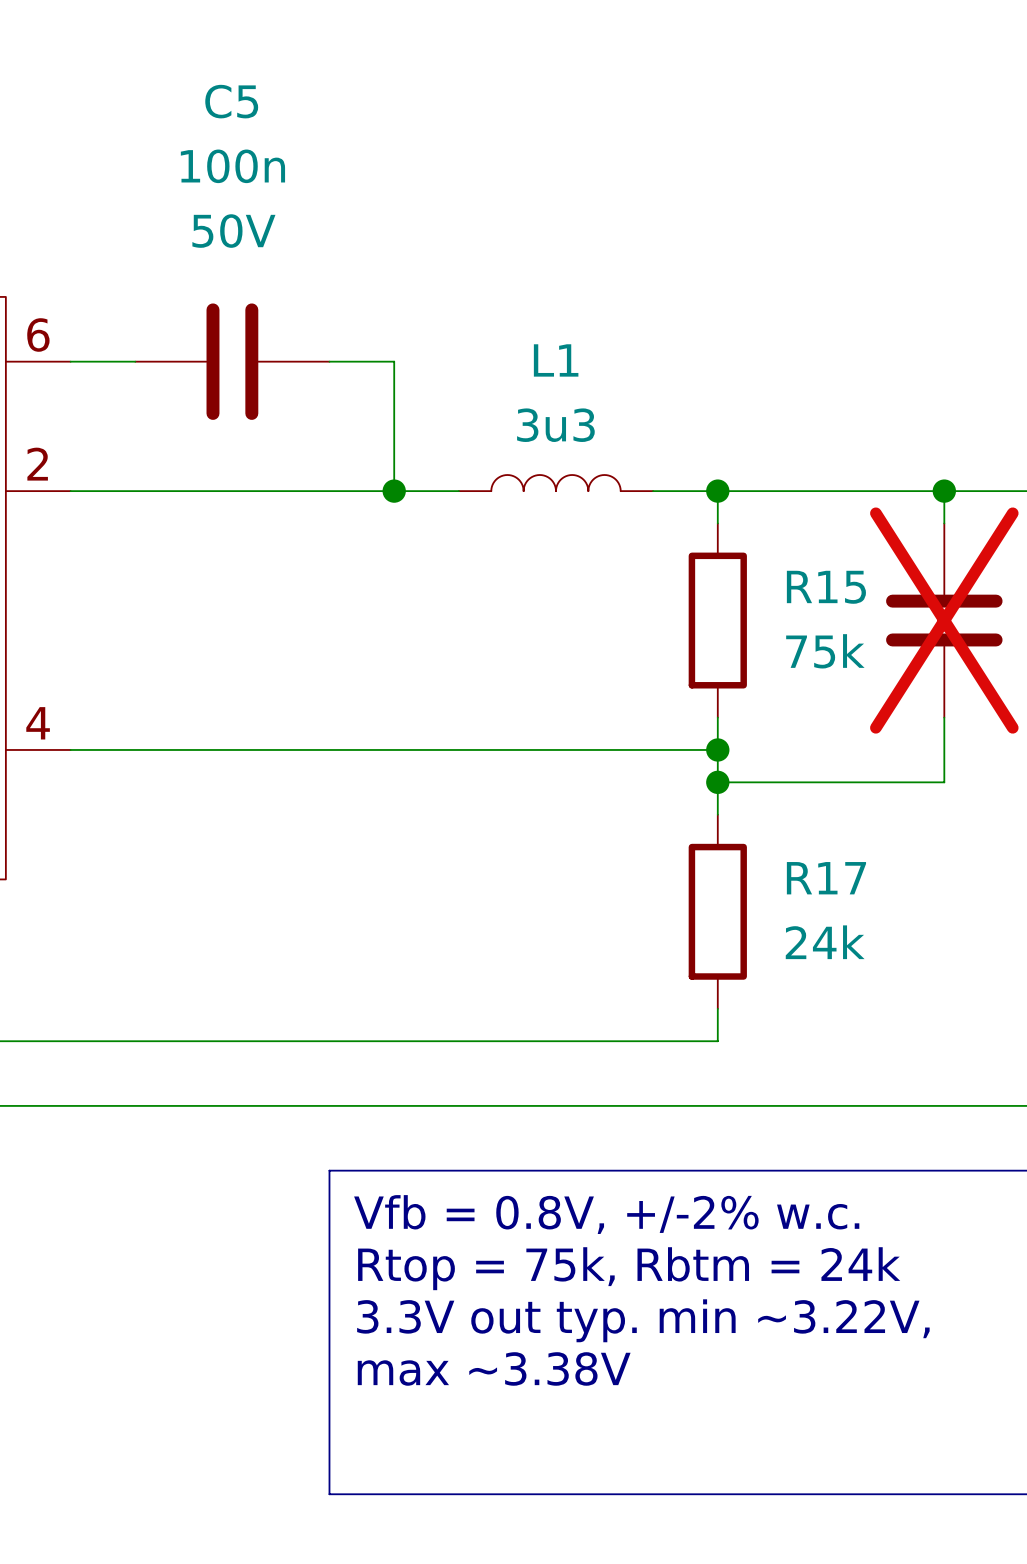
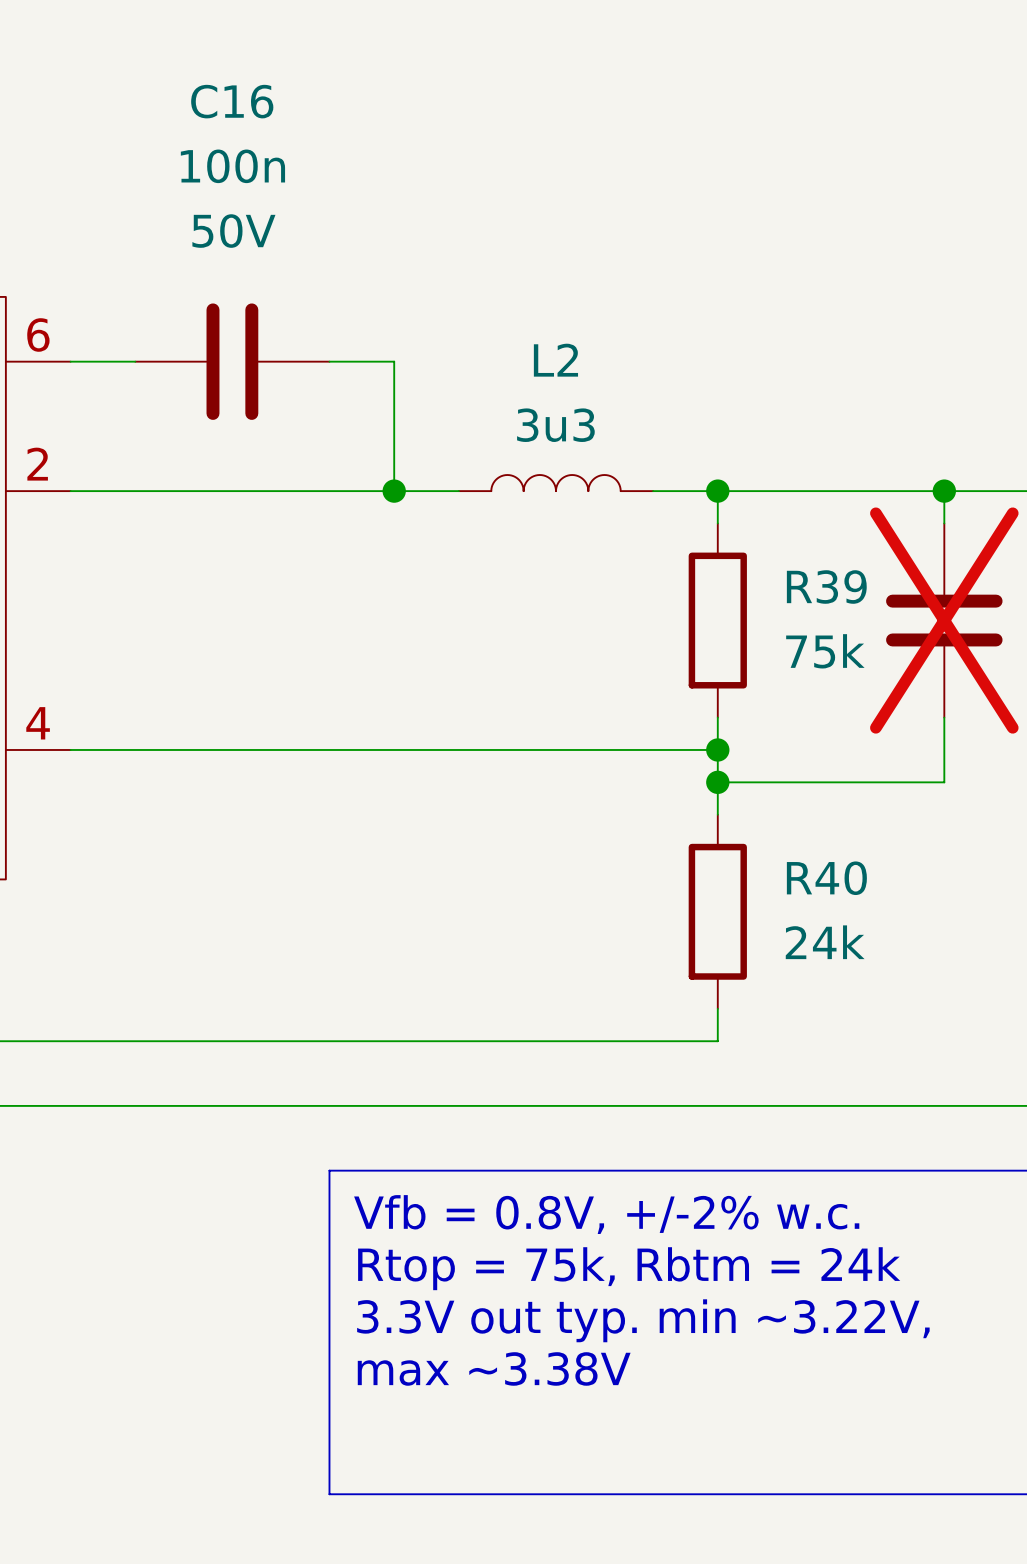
C5 name: C5 (231, 101) -> C16 (232, 101)
L1 name: L1 (556, 360) -> L2 (555, 360)
R15 name: R15 (826, 587) -> R39 (826, 587)
R17 name: R17 (826, 878) -> R40 (826, 878)

